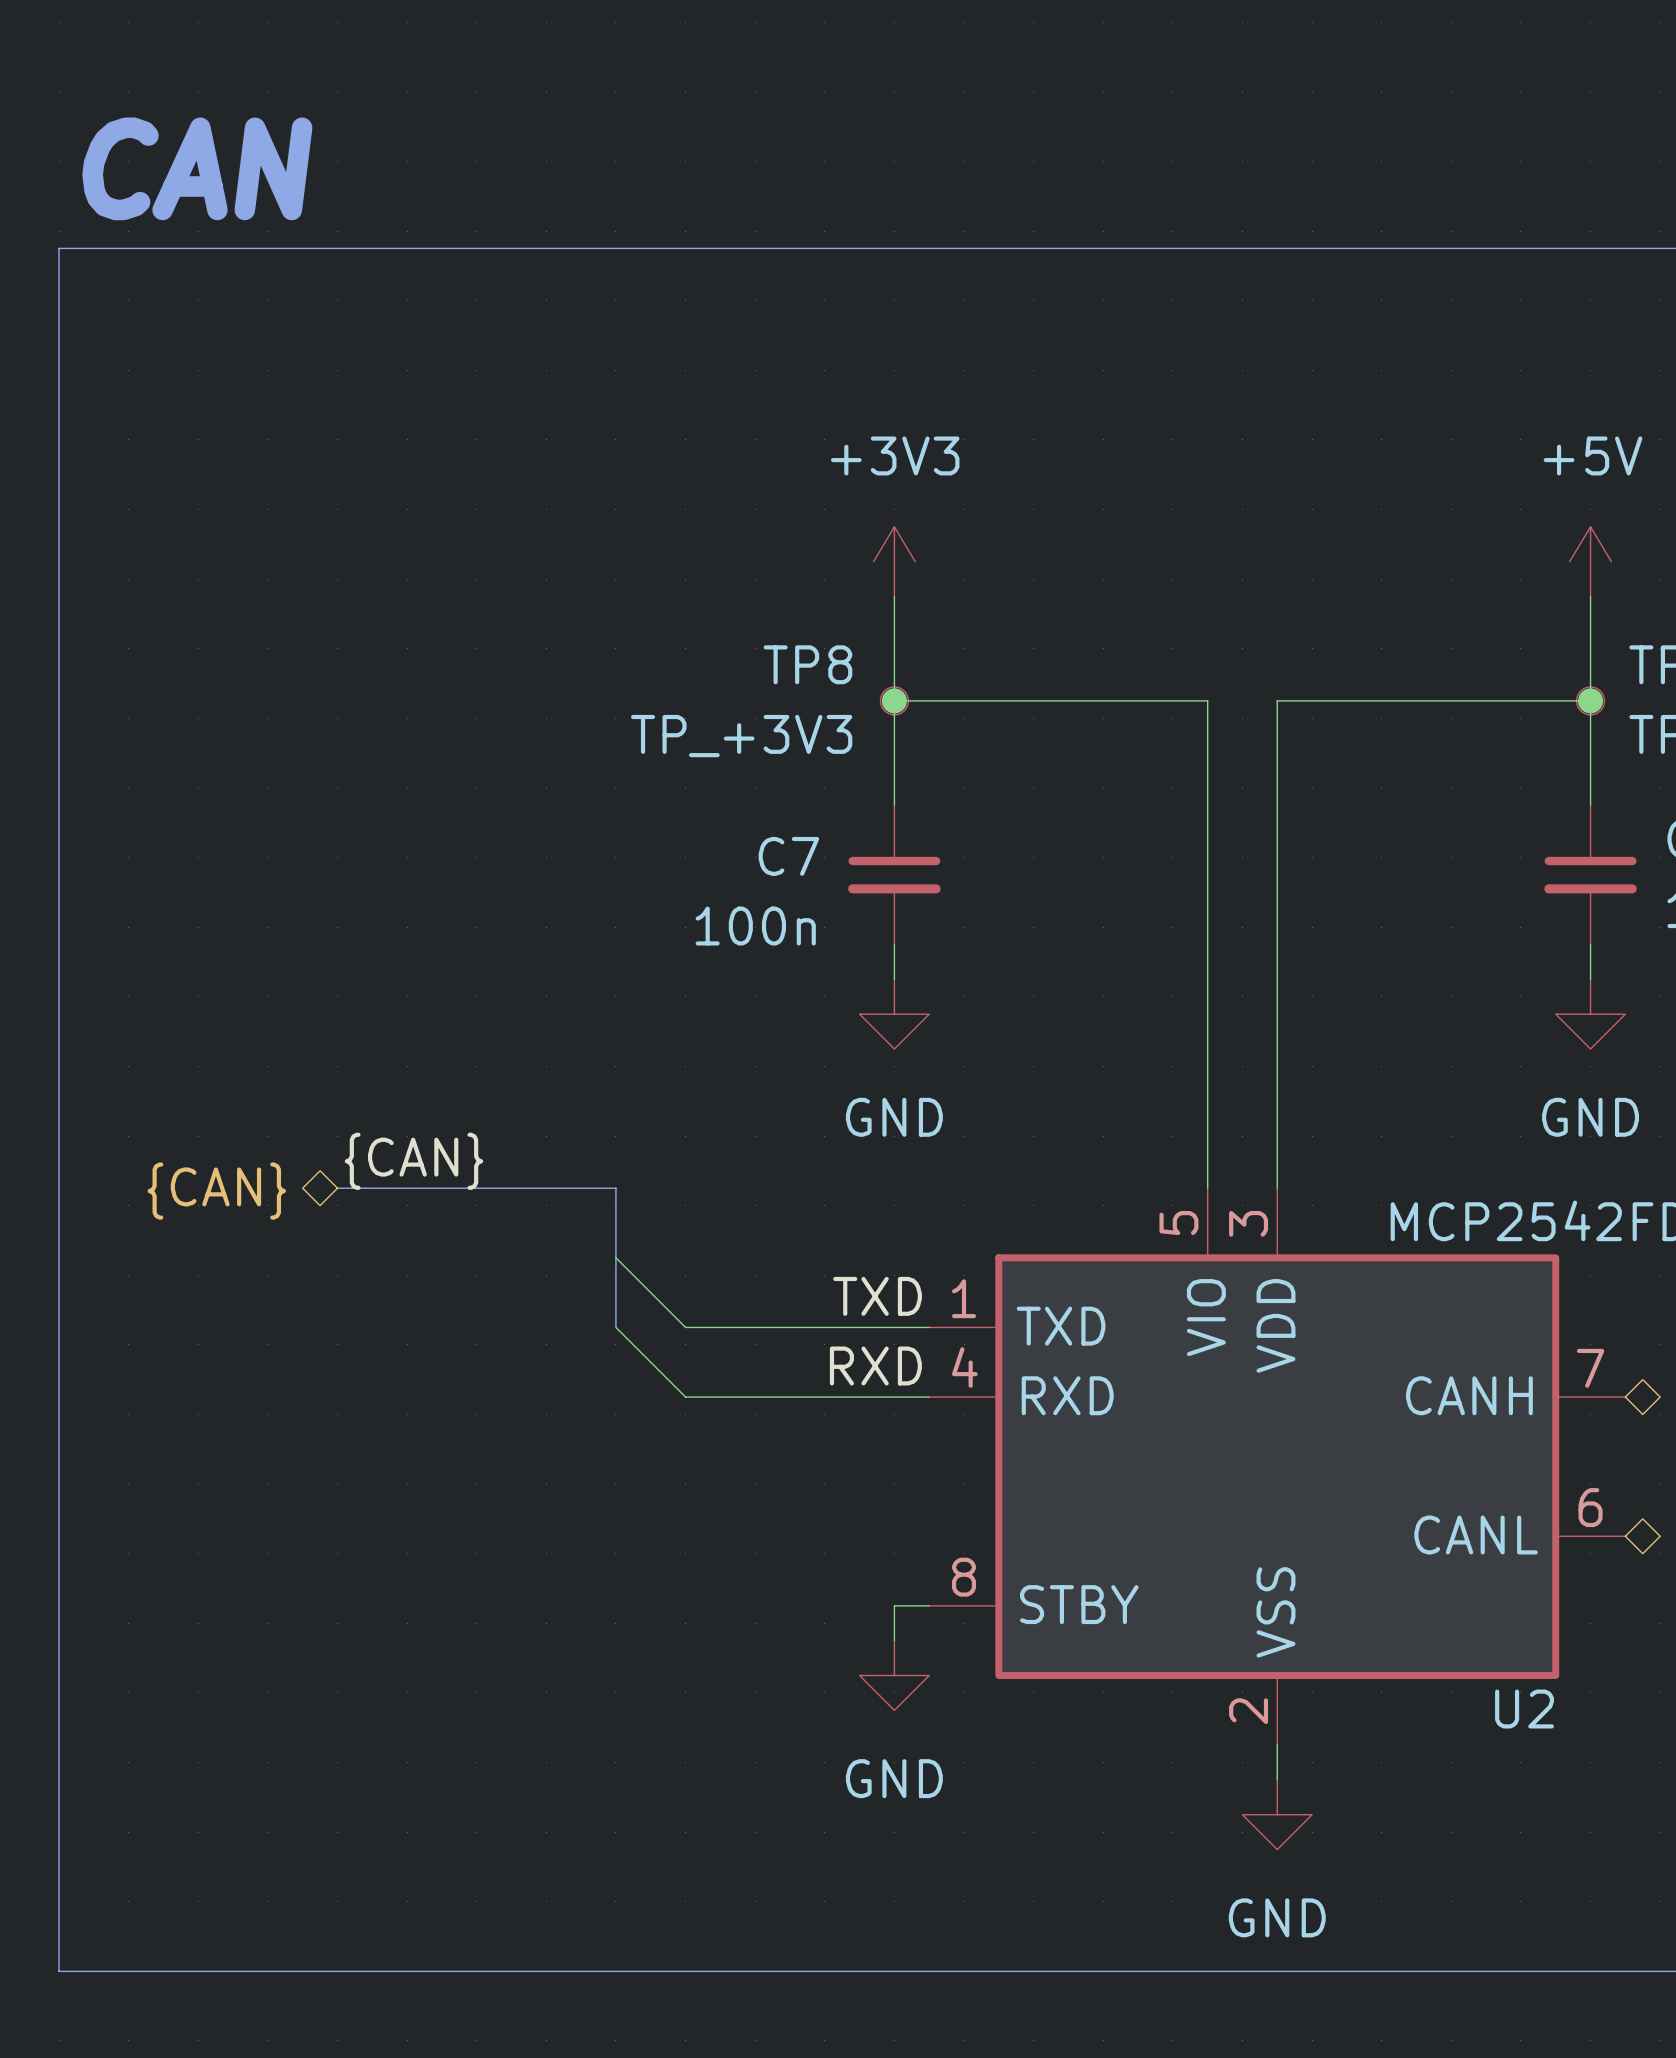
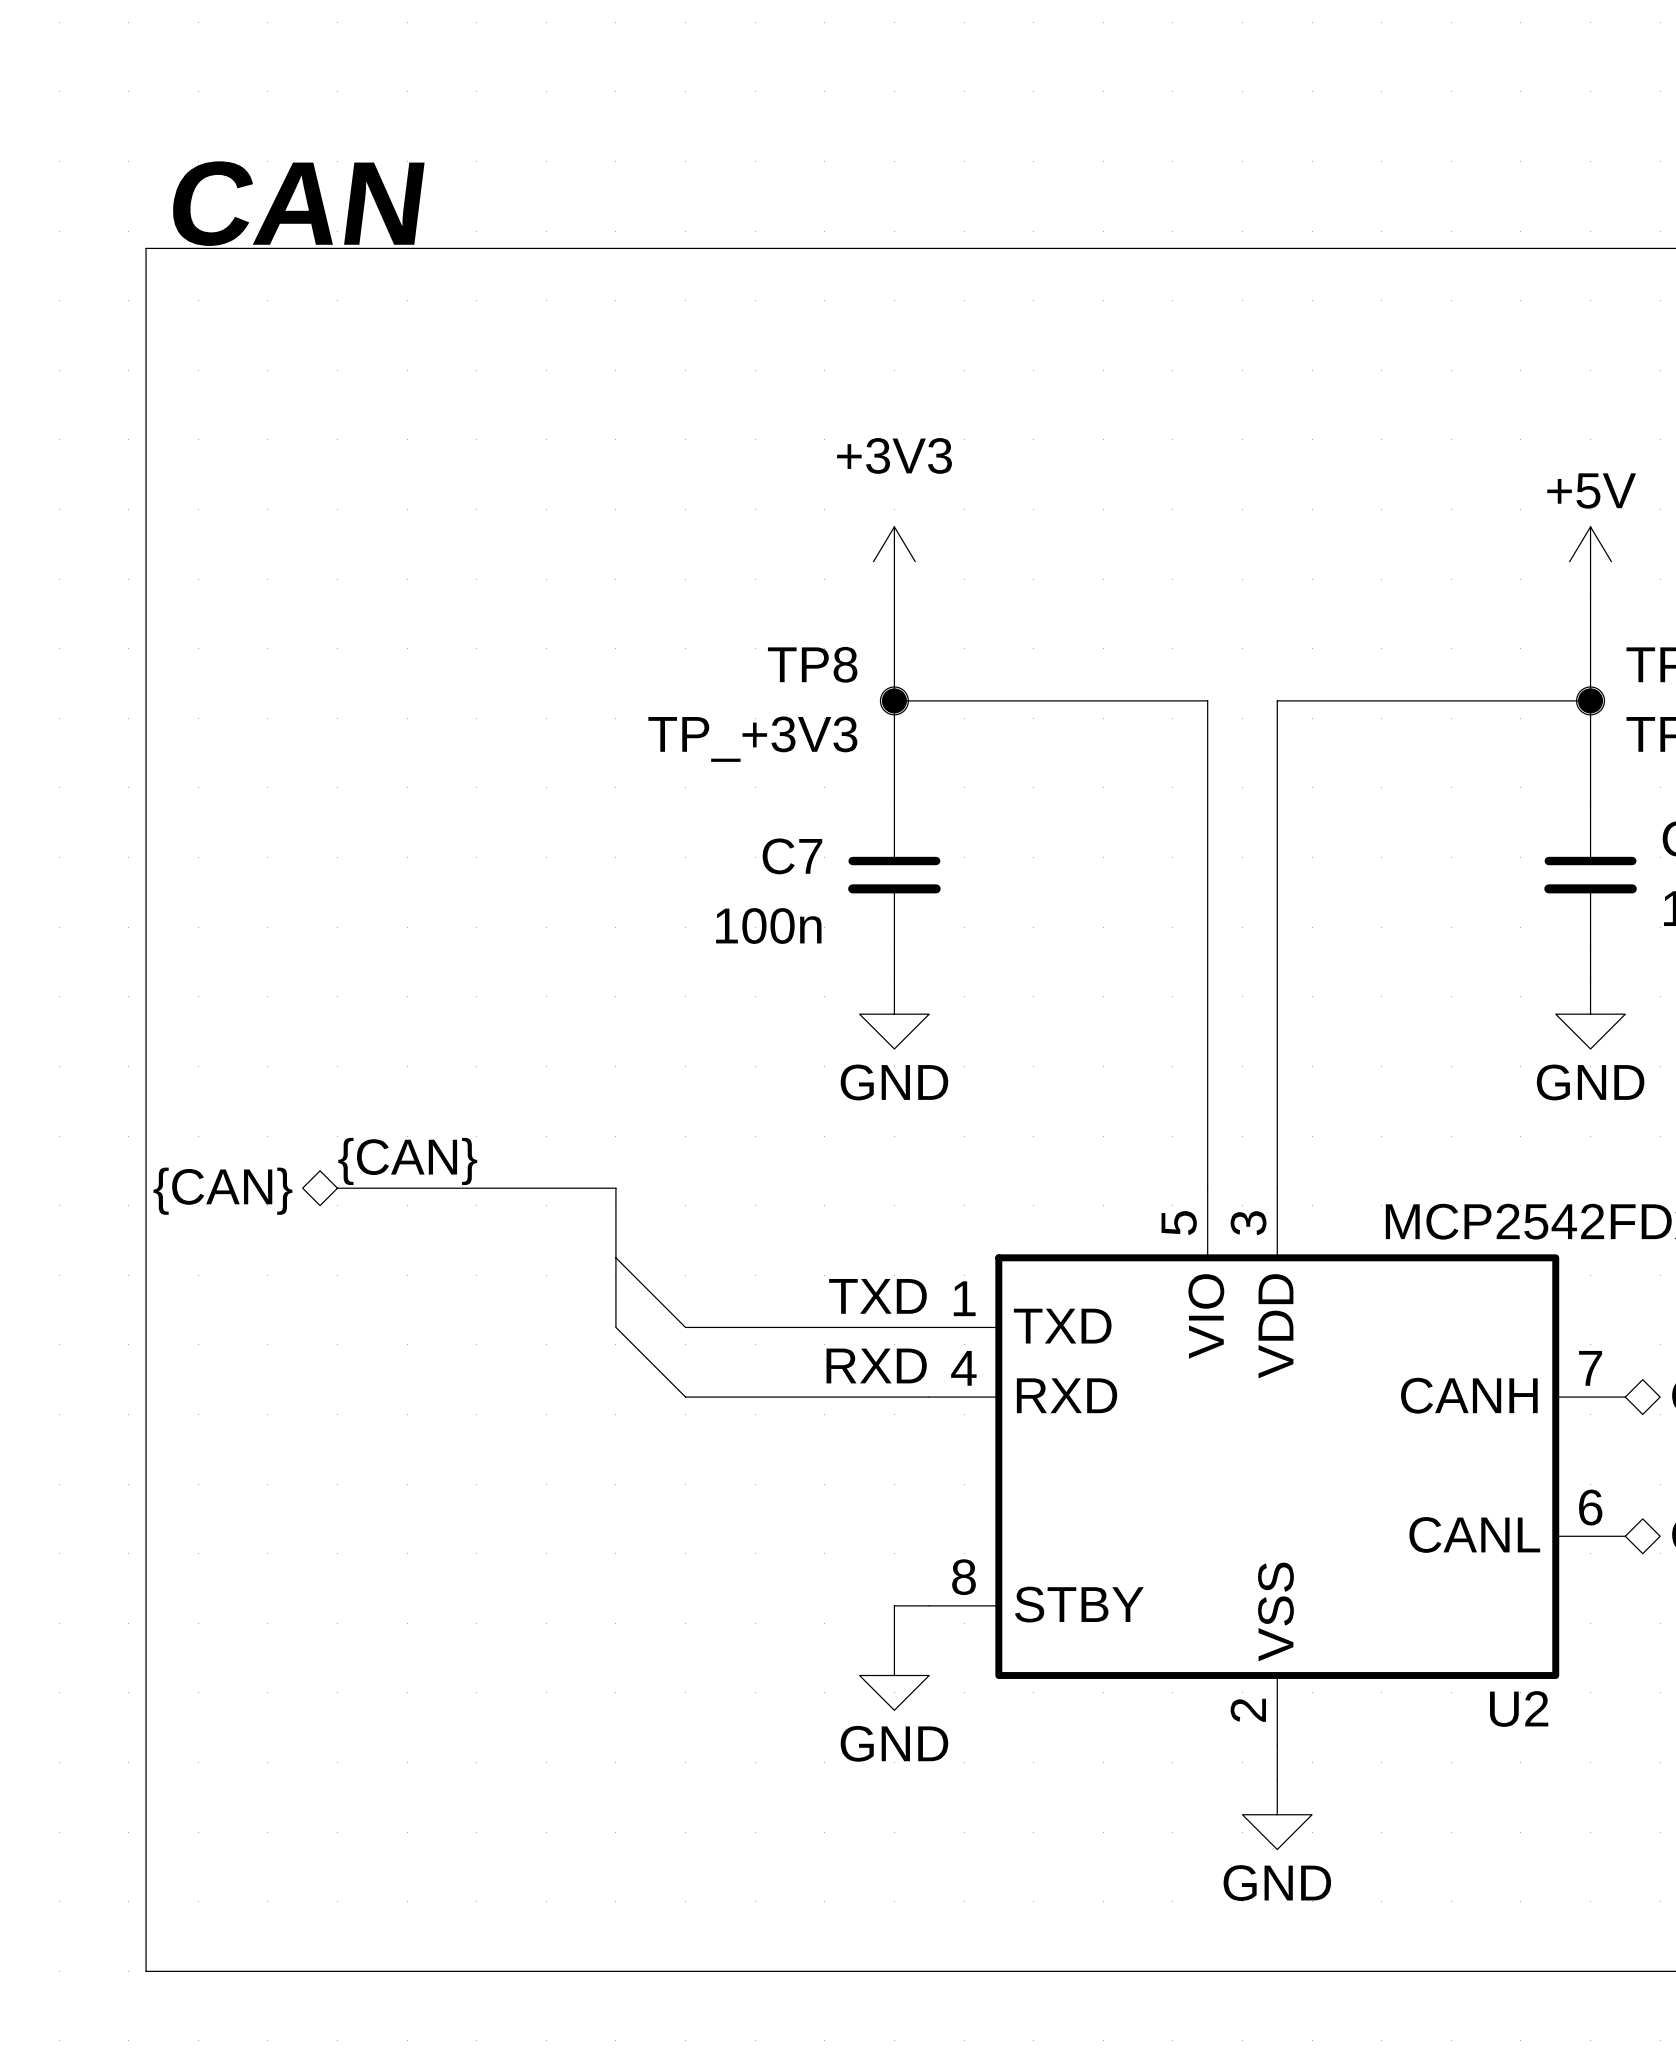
text position: CAN (197, 168) -> CAN (297, 203)
line: (146, 248) (59, 248) (59, 1971) (146, 1971) -> (146, 248) (146, 1971)
power symbol text position: +5V (1593, 455) -> +5V (1591, 491)
power symbol text position: GND (894, 1117) -> GND (894, 1082)
power symbol text position: GND (1590, 1117) -> GND (1590, 1082)
power symbol text position: GND (894, 1778) -> GND (894, 1743)
power symbol text position: GND (1277, 1917) -> GND (1277, 1883)

